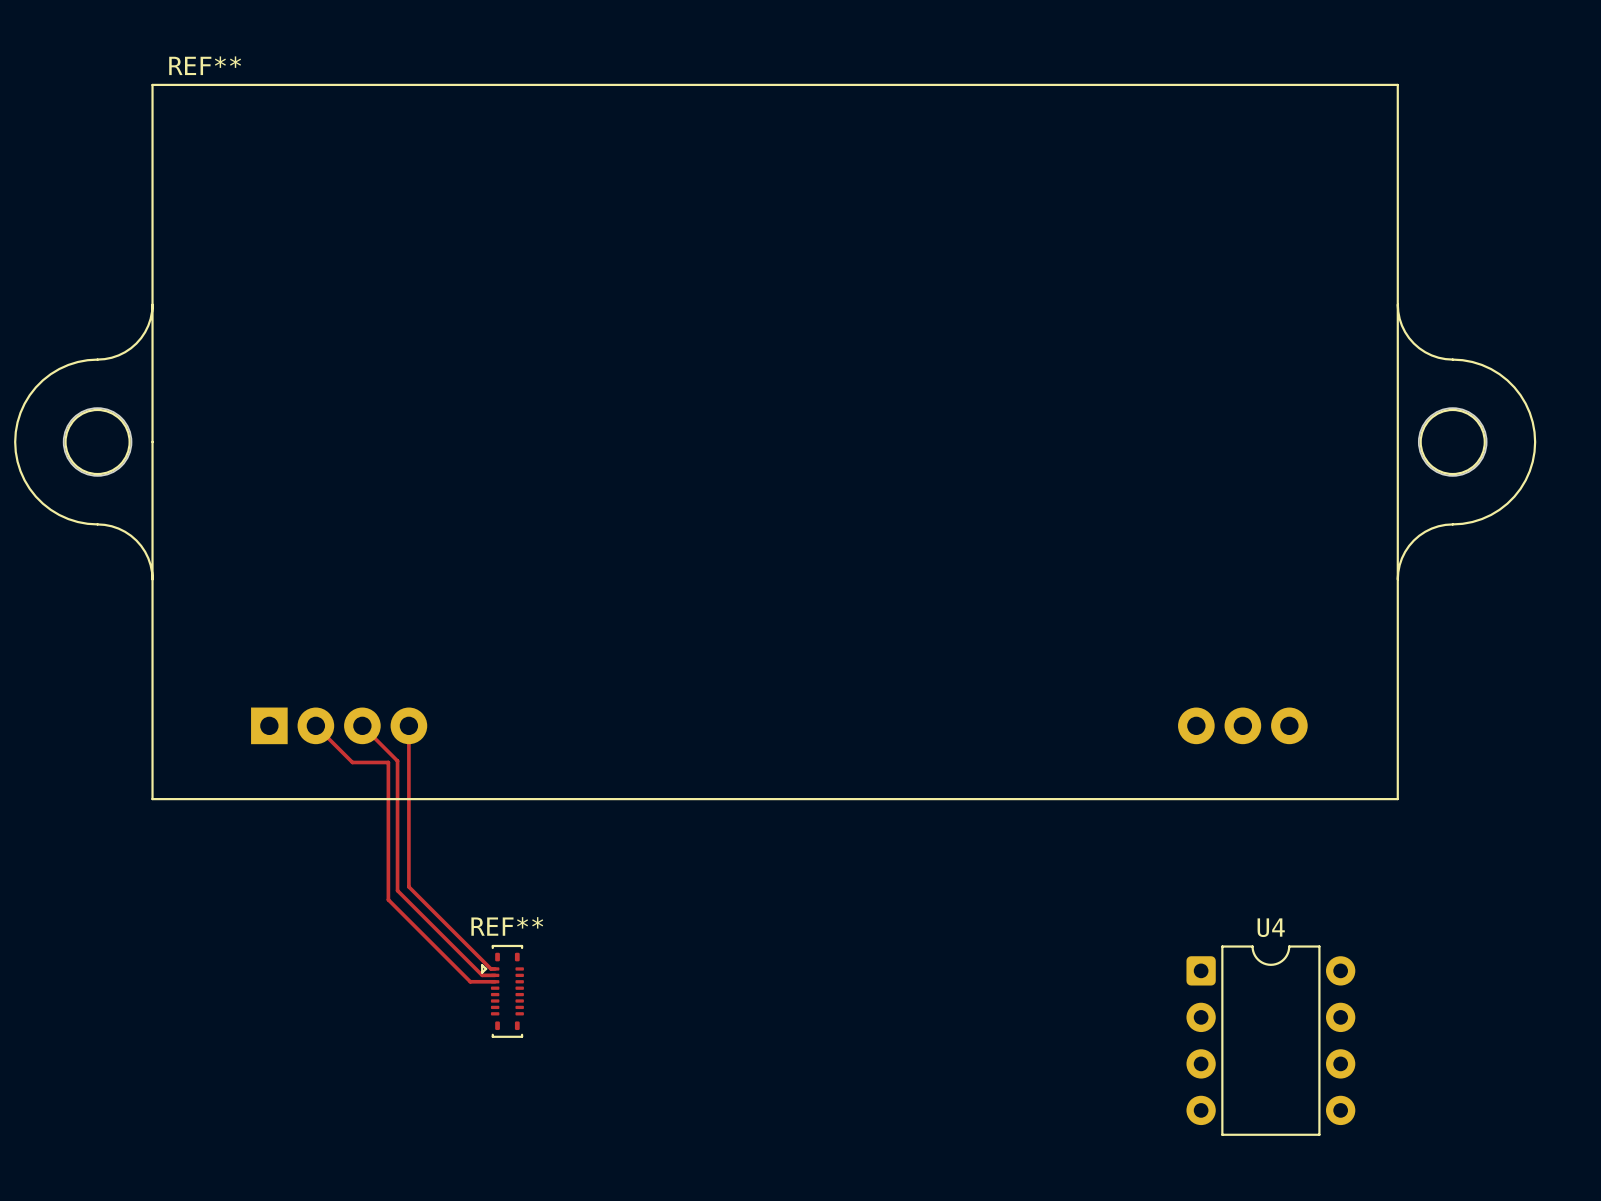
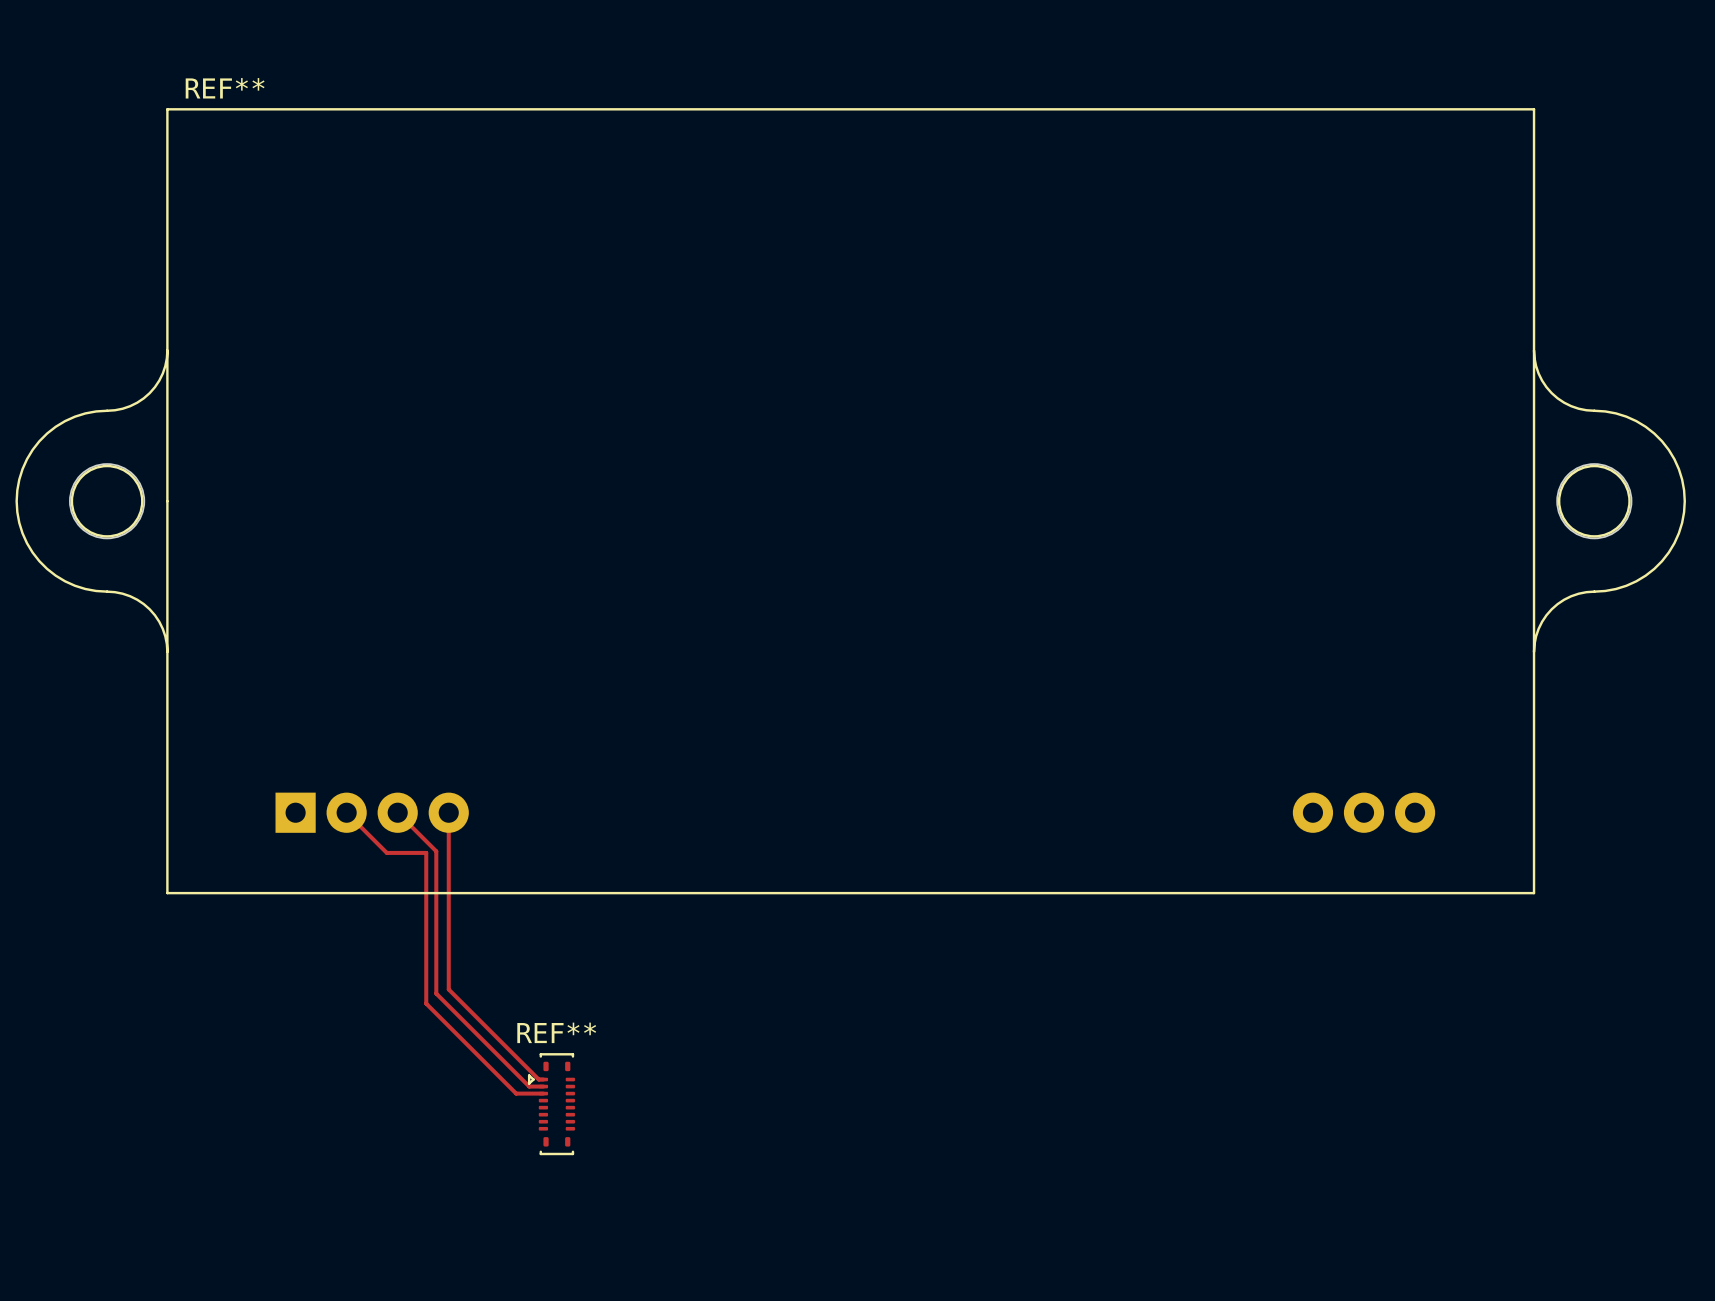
U4: (1270, 1040) -> none

